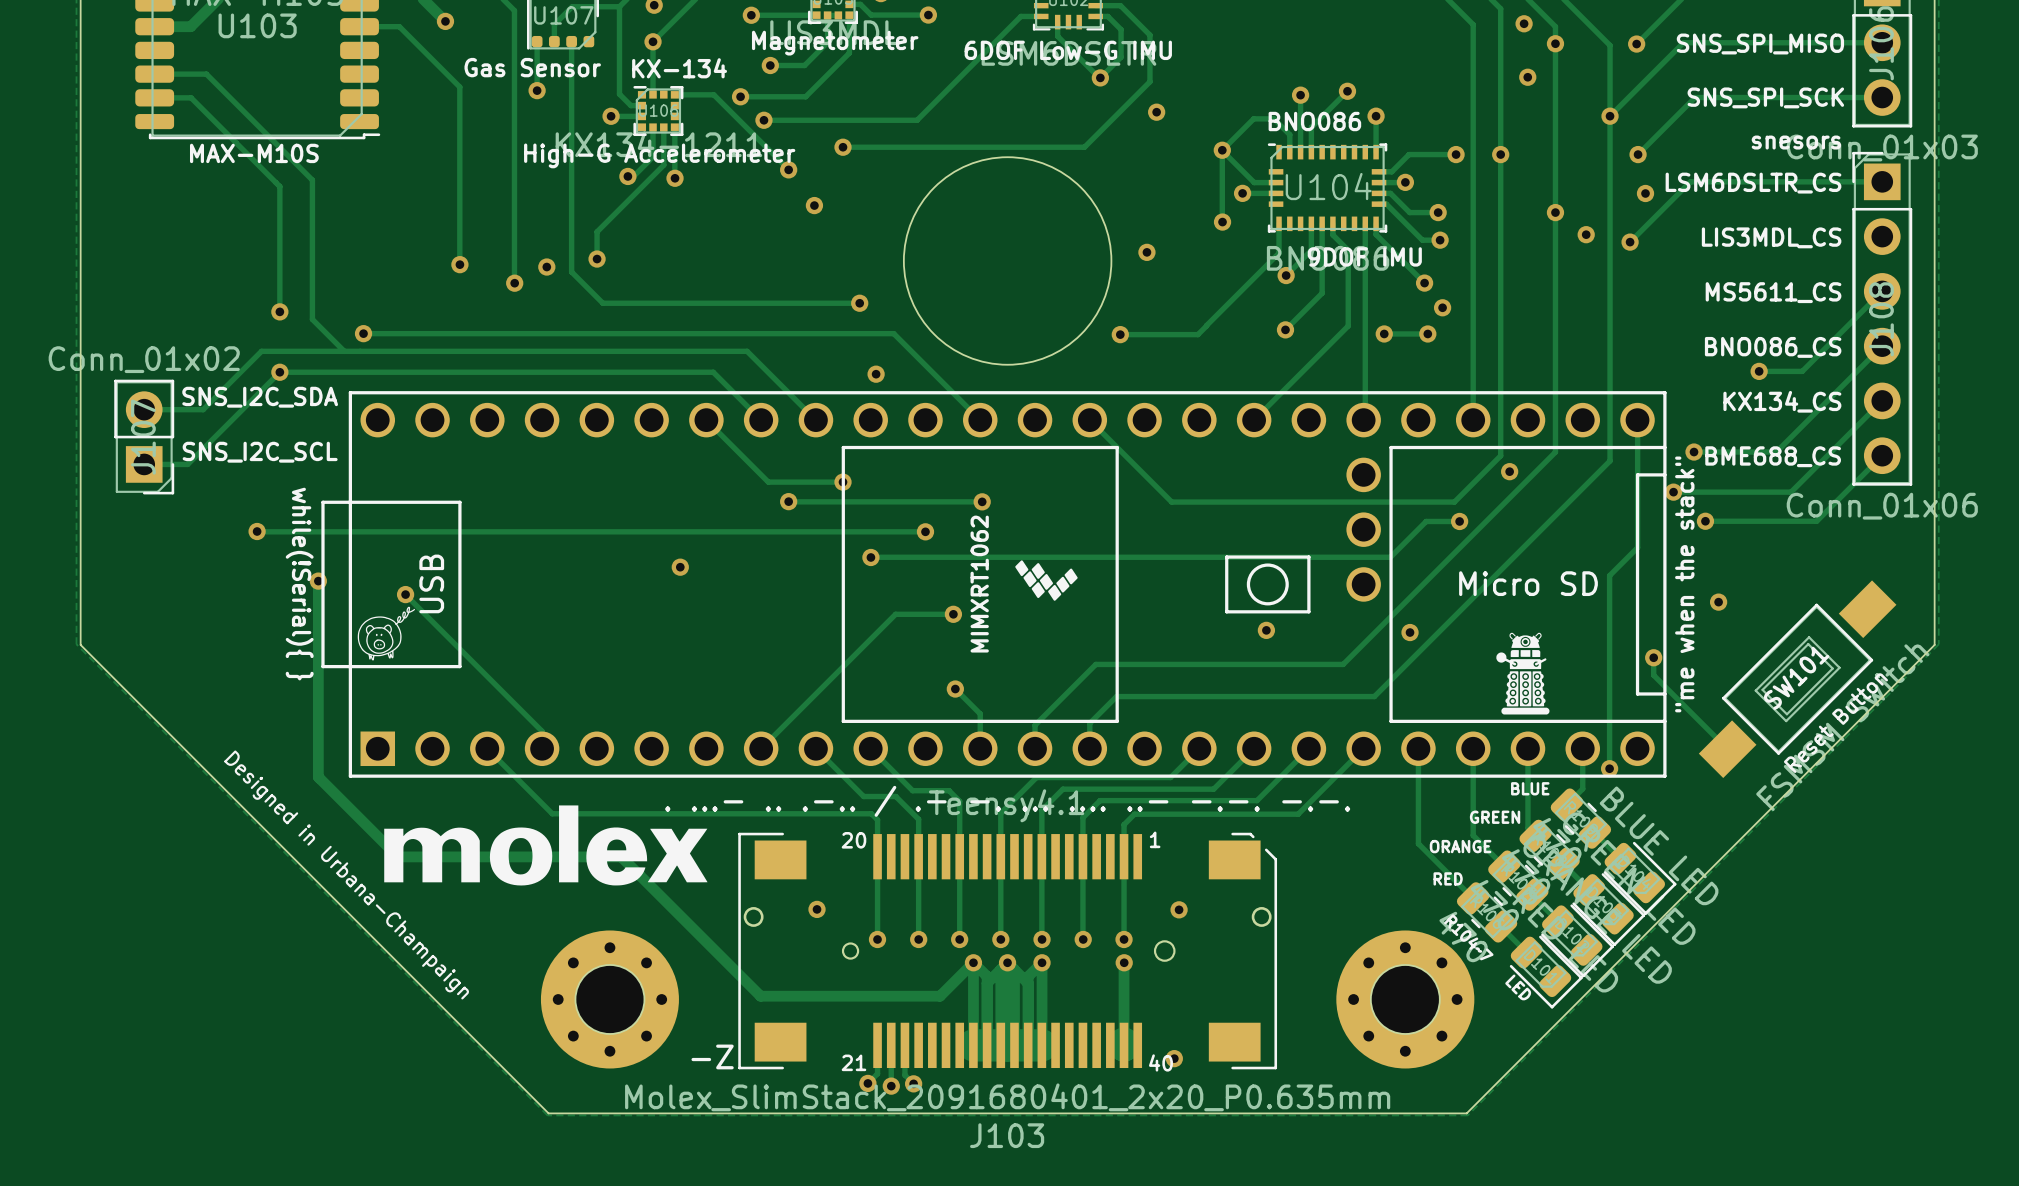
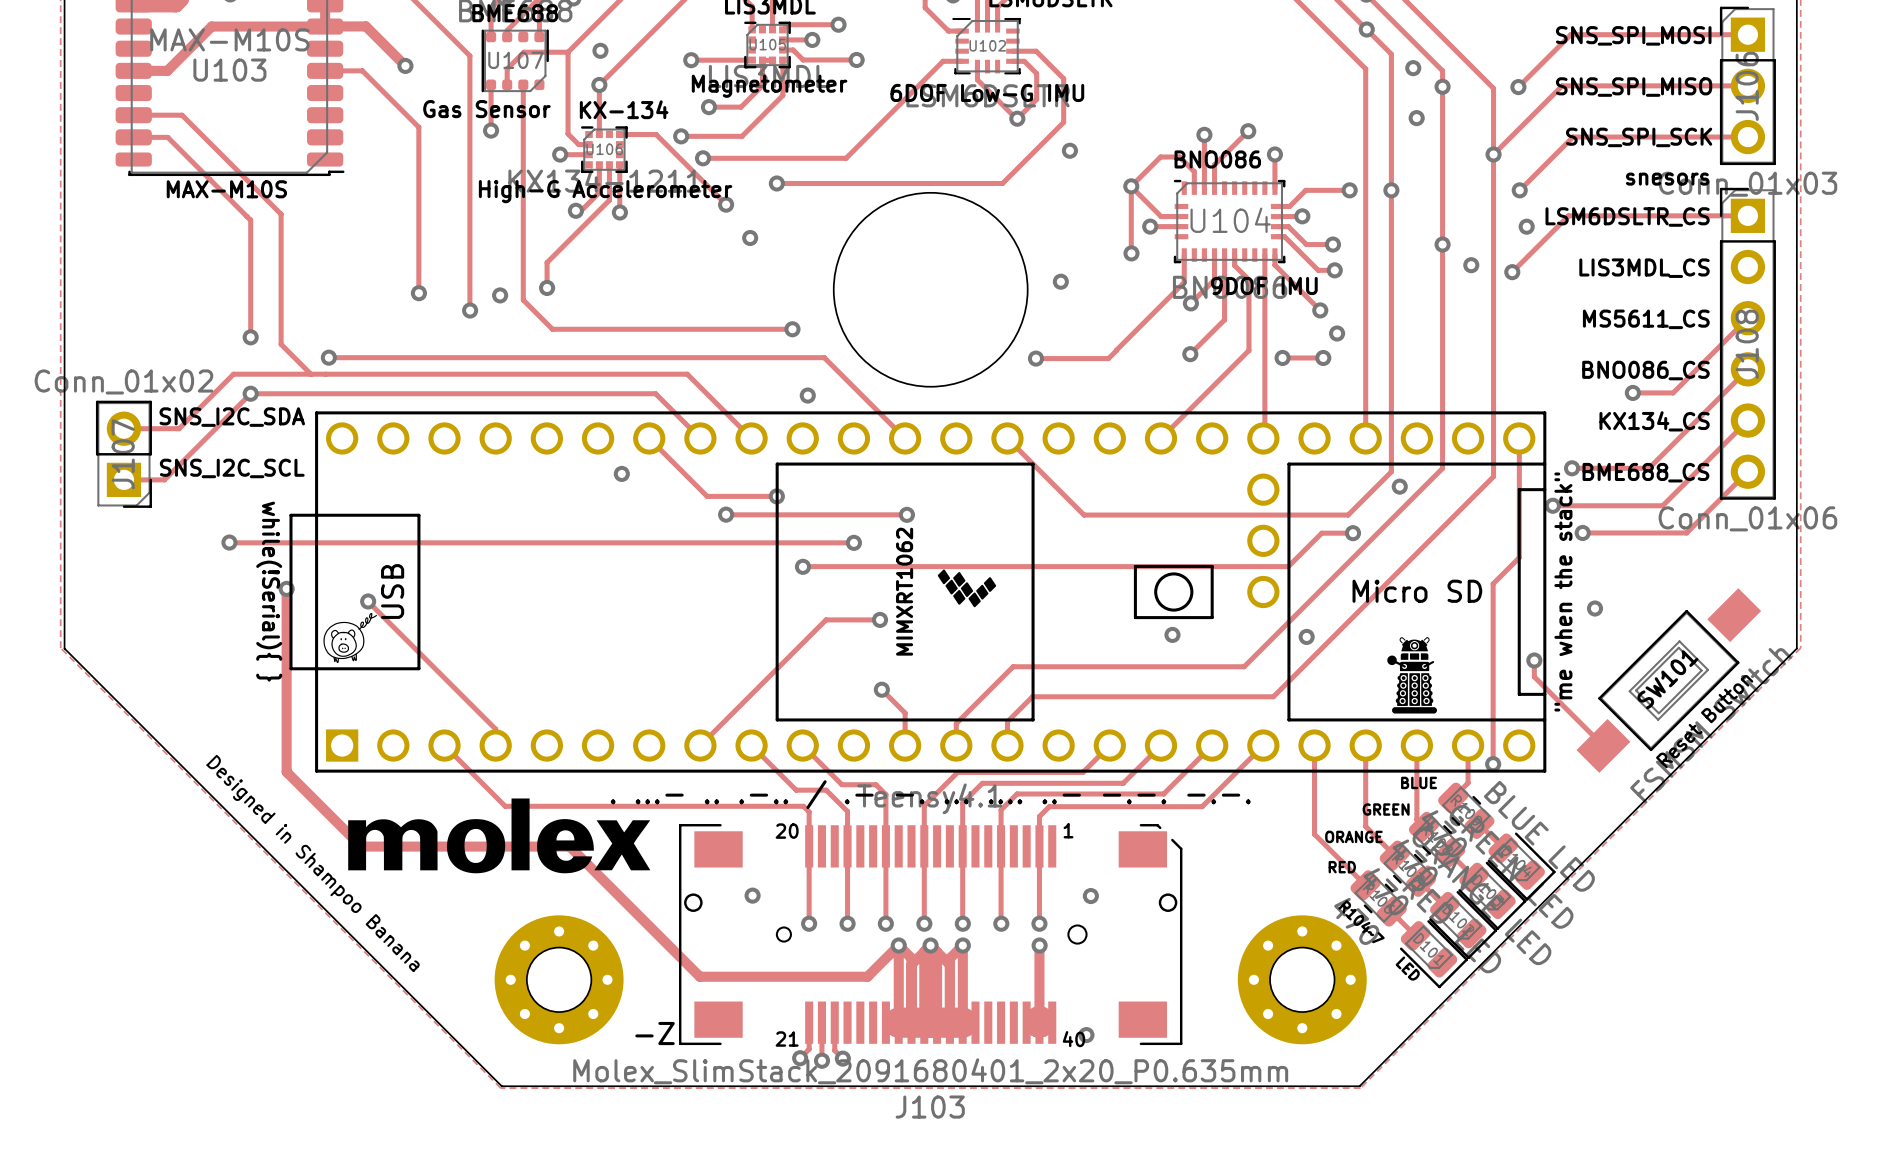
via position: (680, 567) -> (621, 473)
text: Designed in Urbana-Champaign (346, 874) -> Designed in Shampoo Banana (313, 863)

